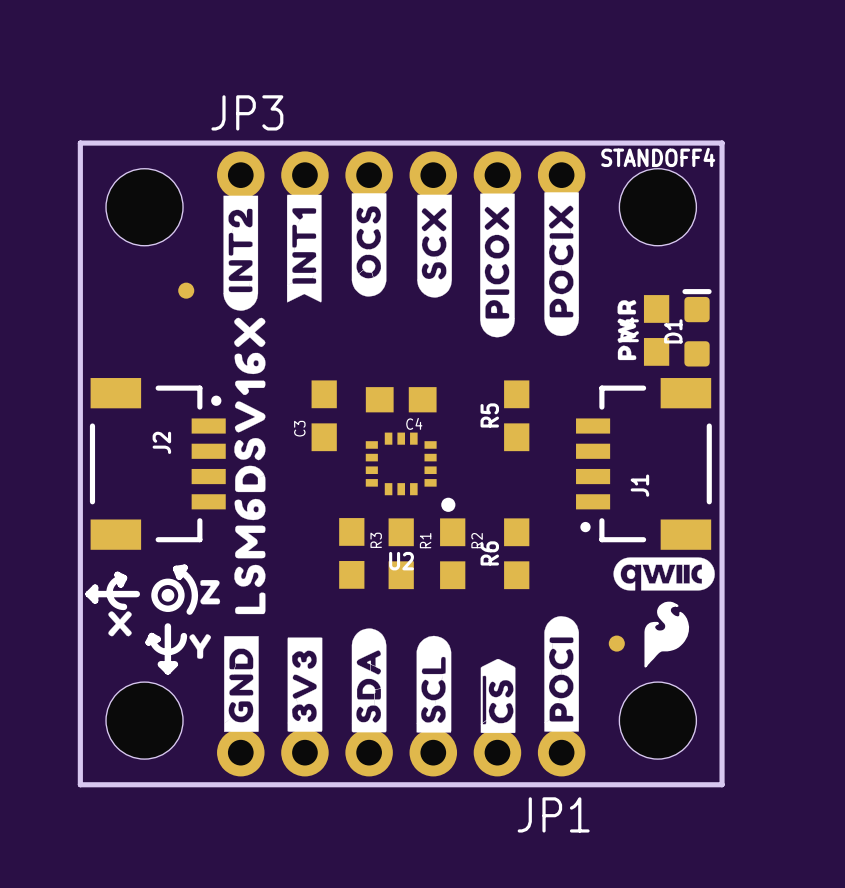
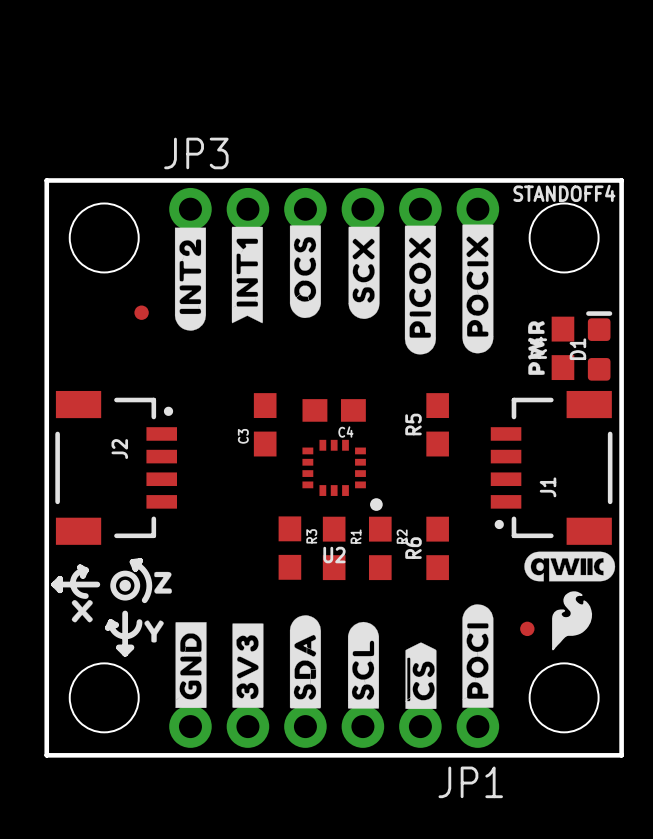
drawing: [234, 317, 266, 615] -> none

